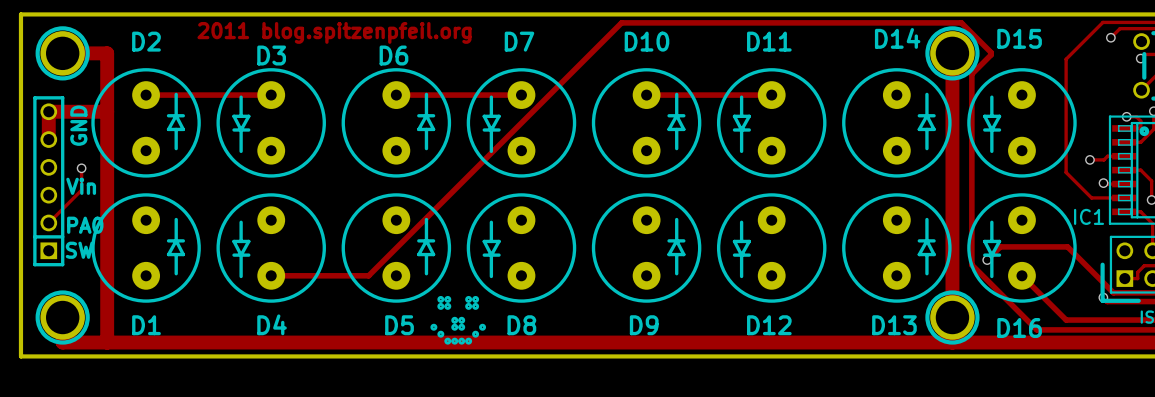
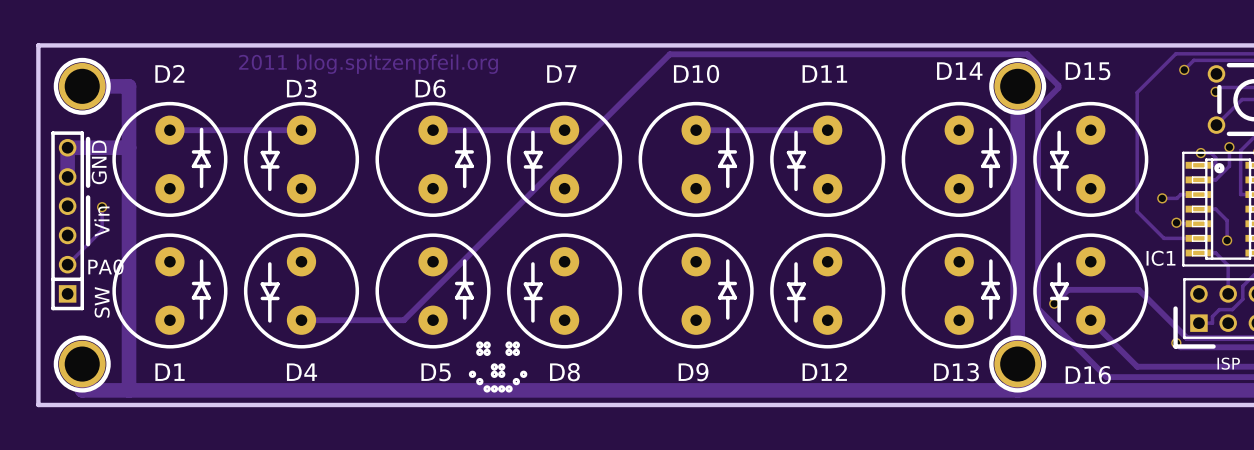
line: none -> (88, 138) (88, 185)
line: none -> (88, 197) (88, 244)
text rotation: 0° (81, 186) -> 90° counterclockwise (101, 221)
text rotation: 0° (79, 250) -> 90° counterclockwise (102, 302)

